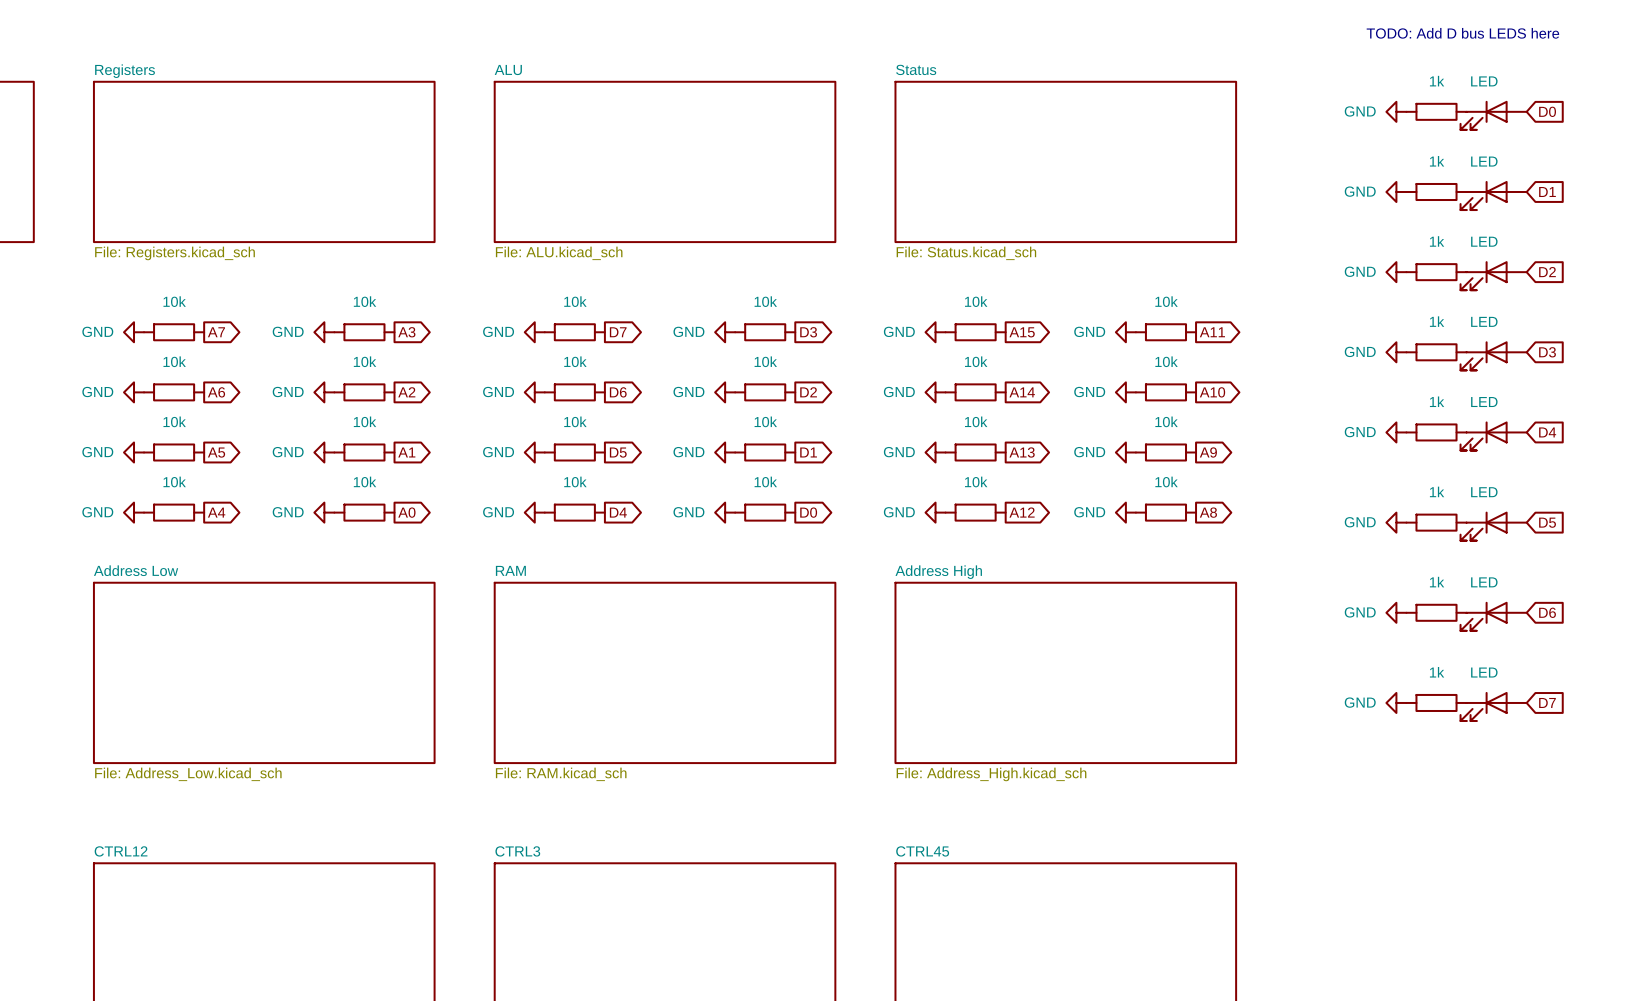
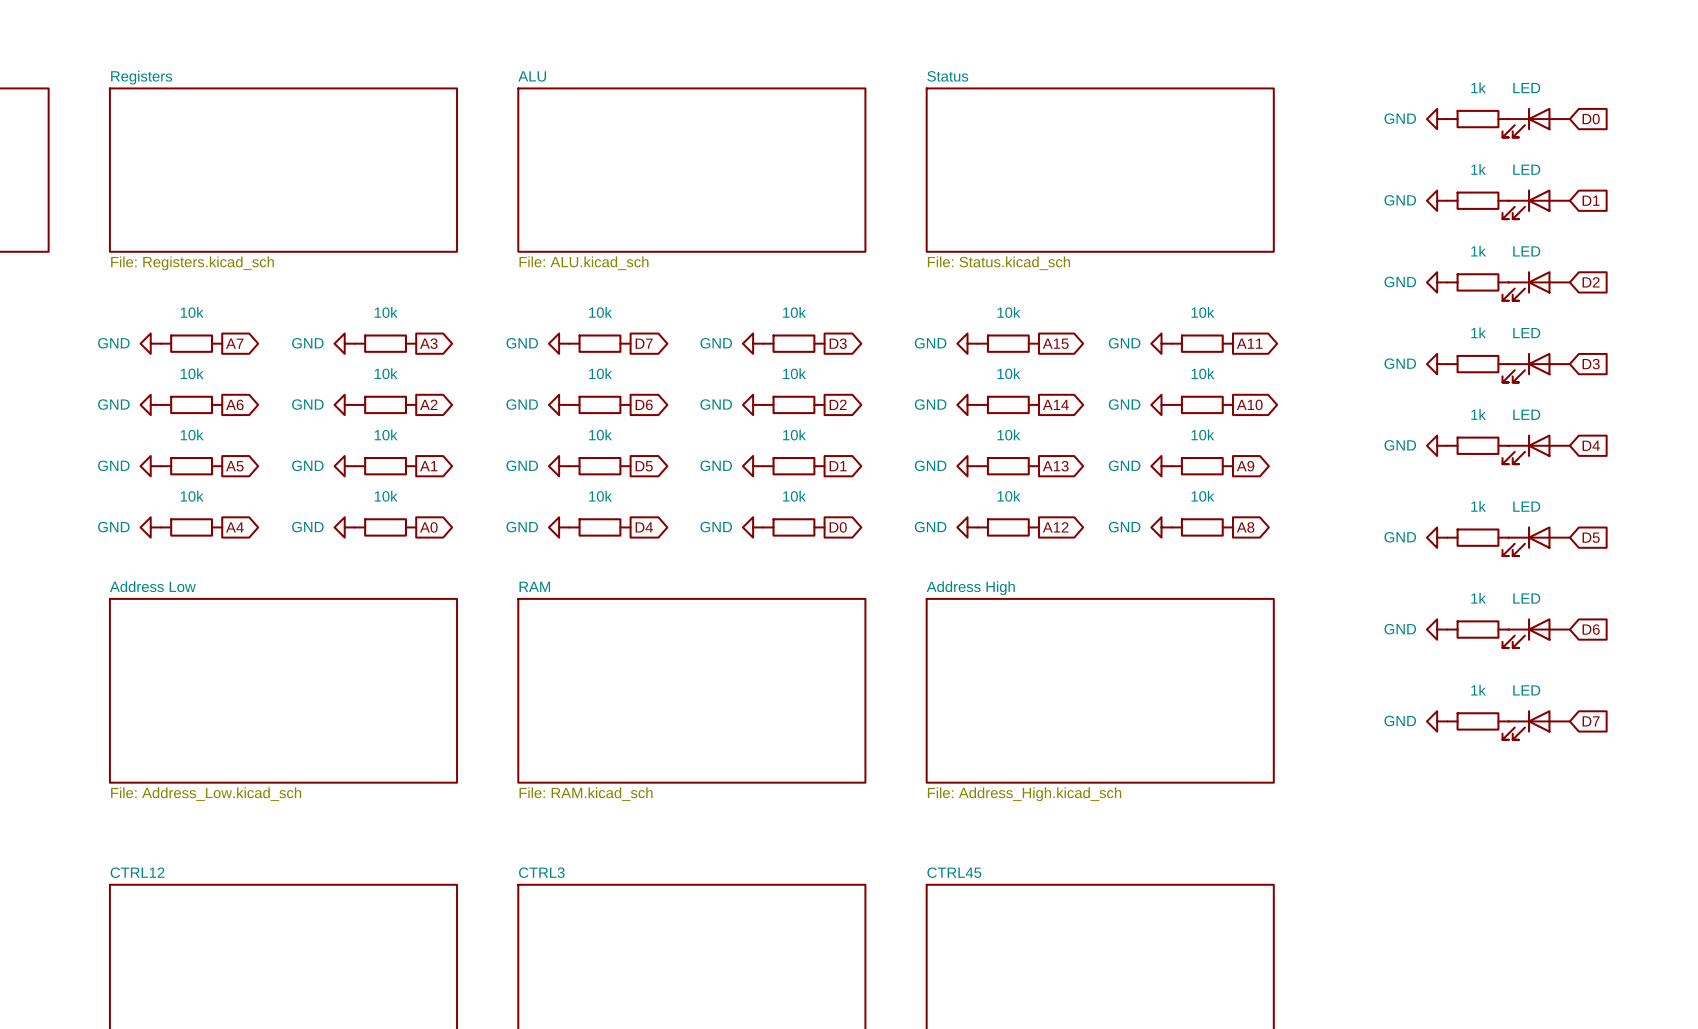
text: TODO: Add D bus LEDS here (1462, 33) -> none

